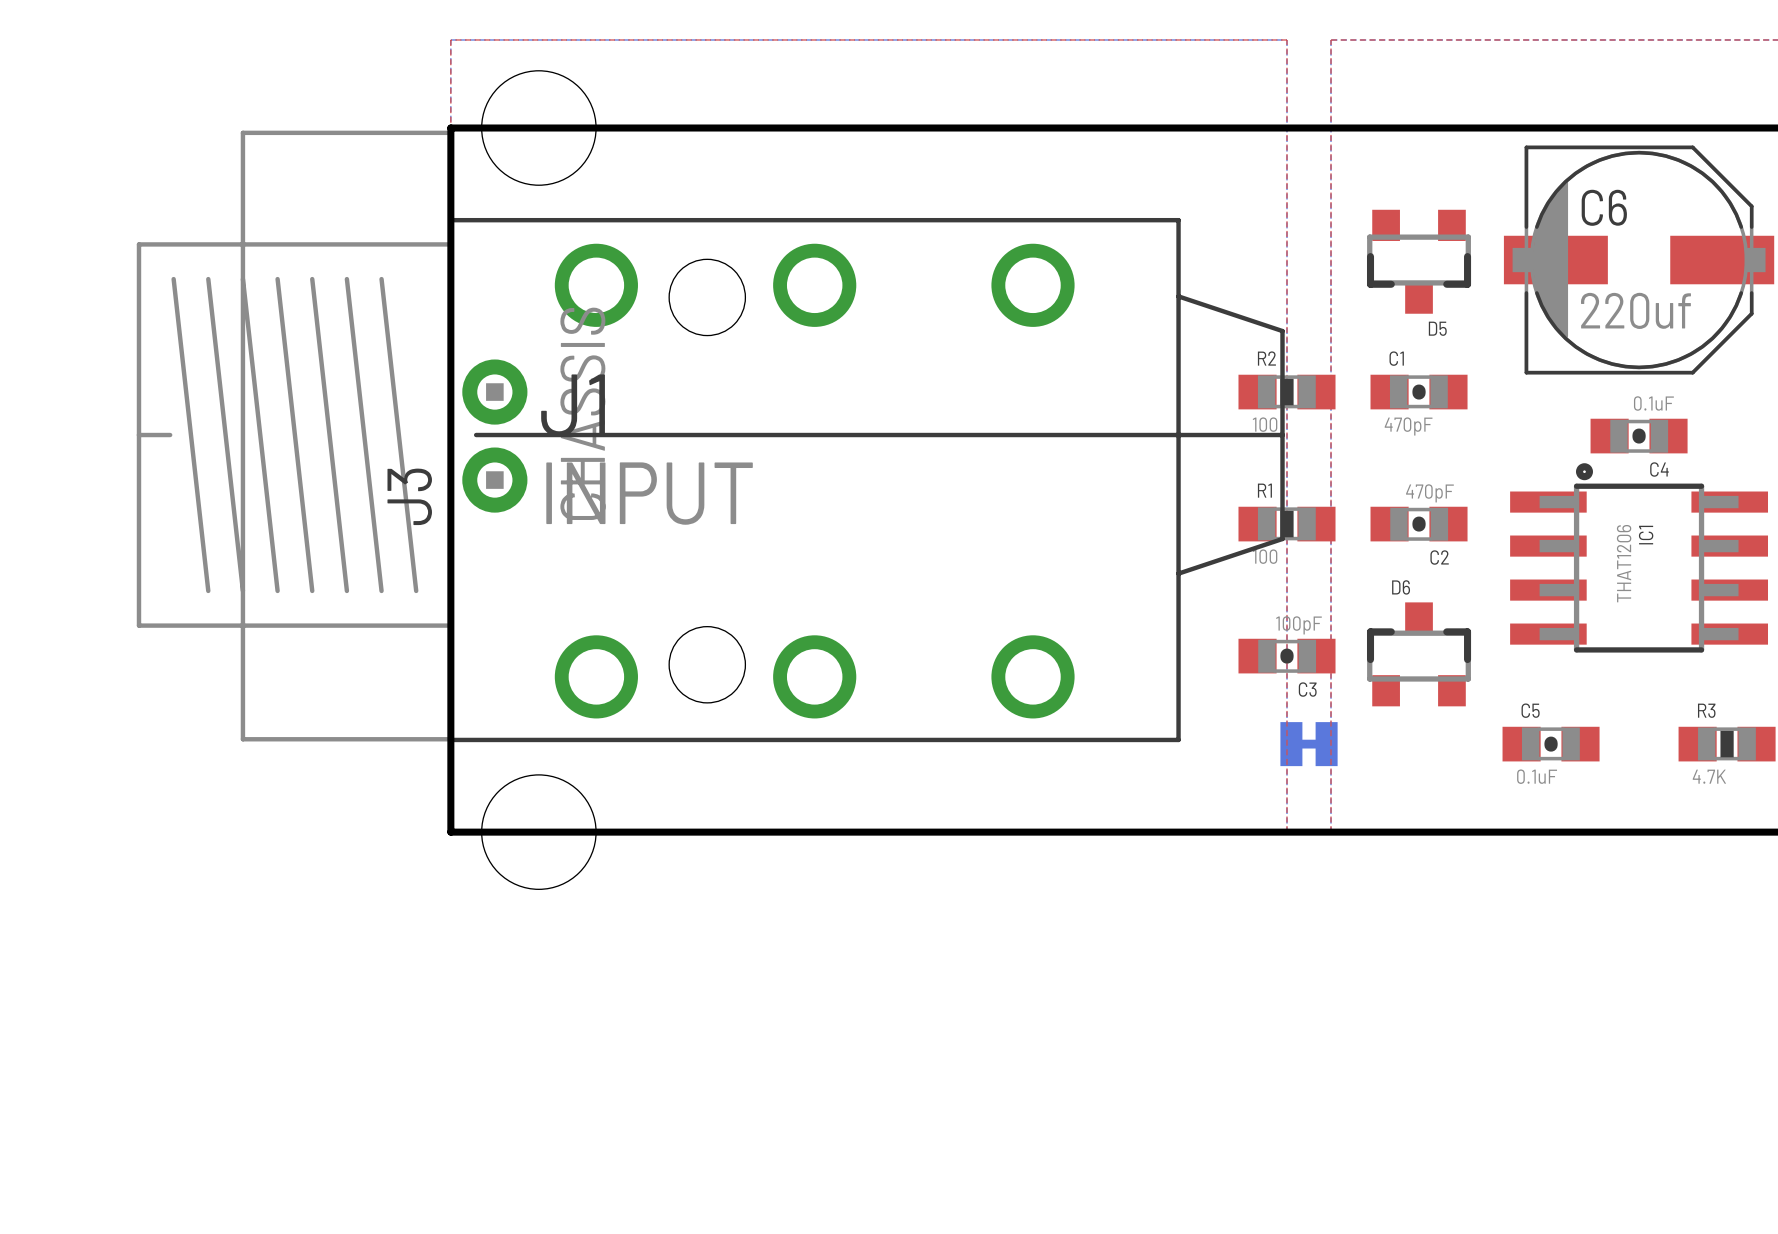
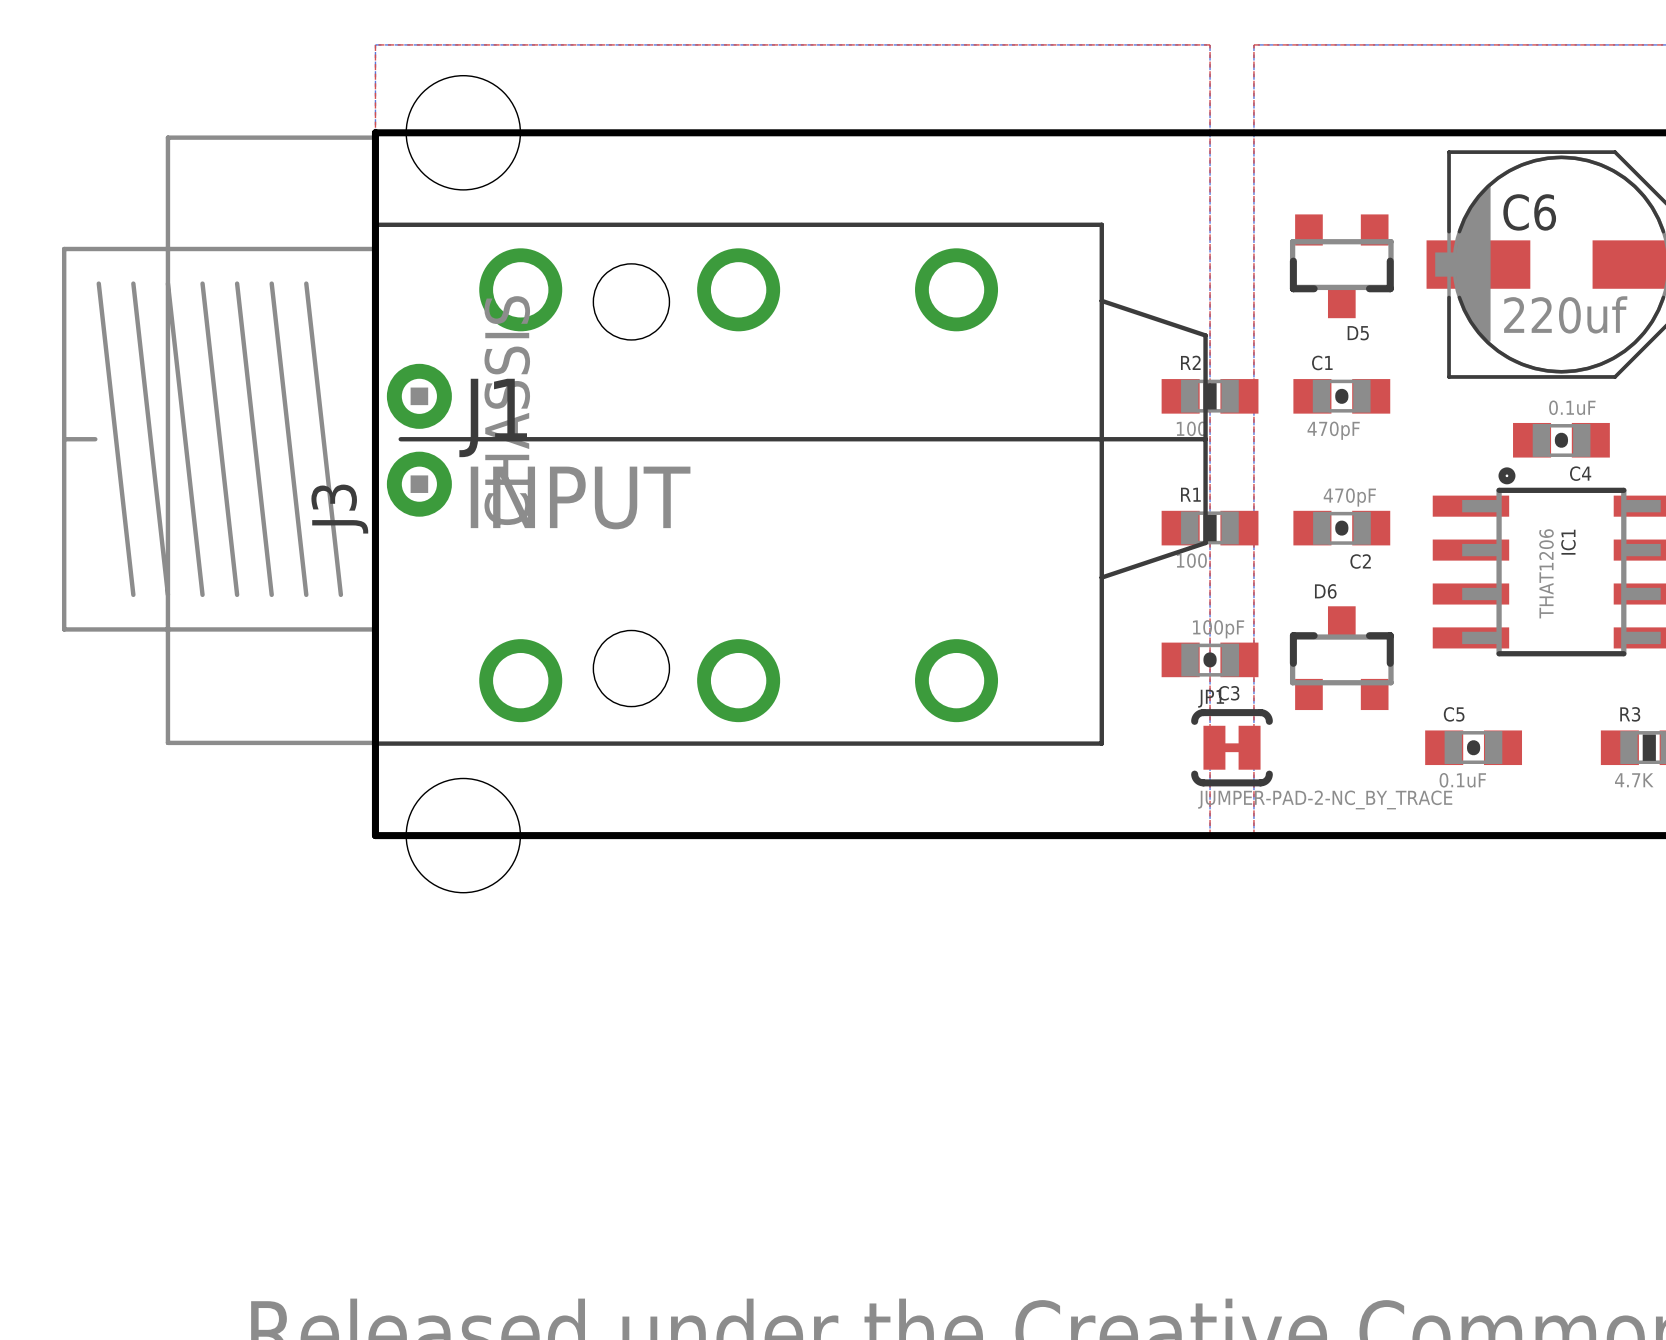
JP1 side: bottom (1309, 744) -> top (1232, 747)

